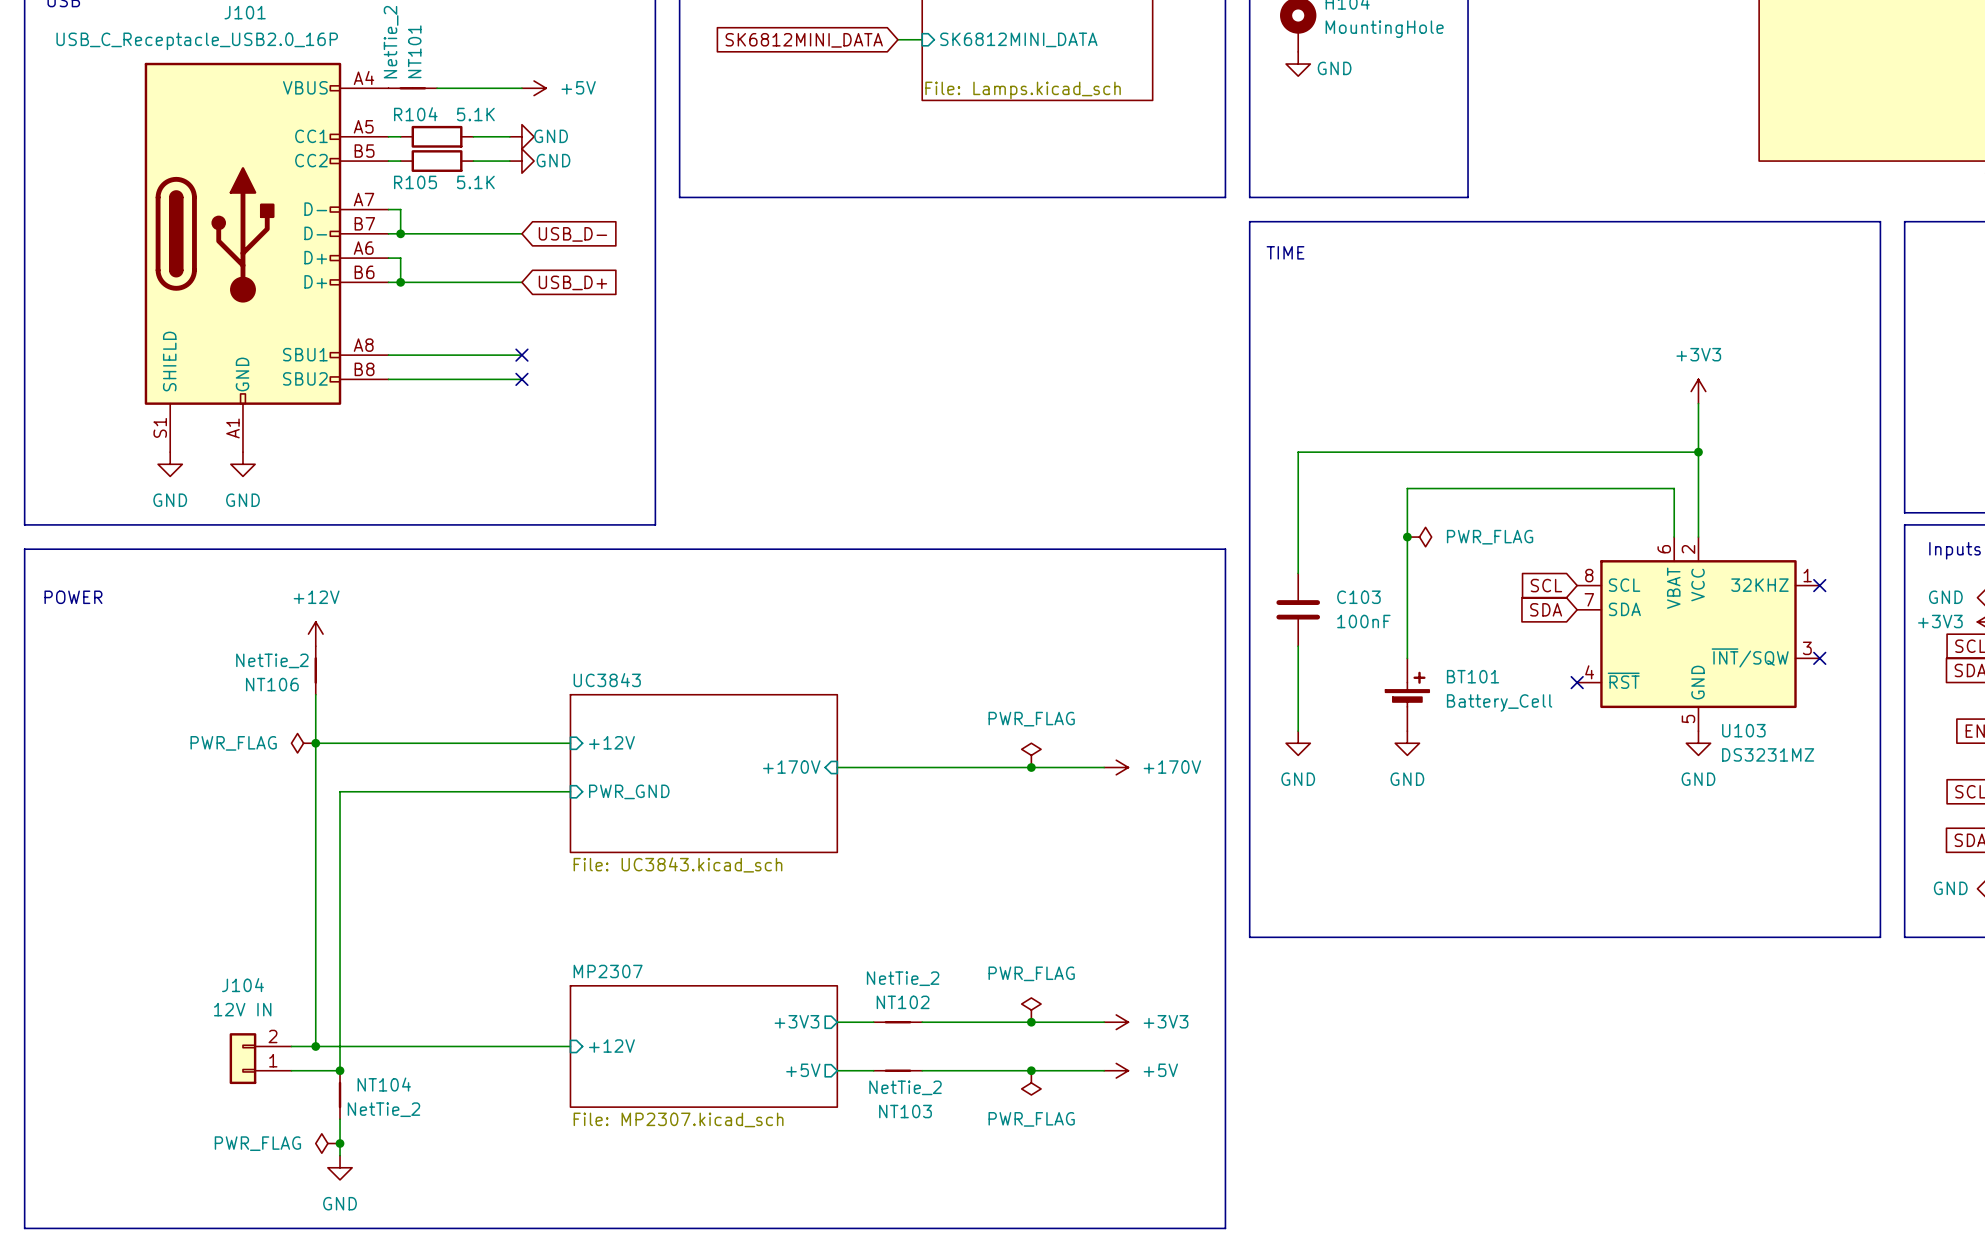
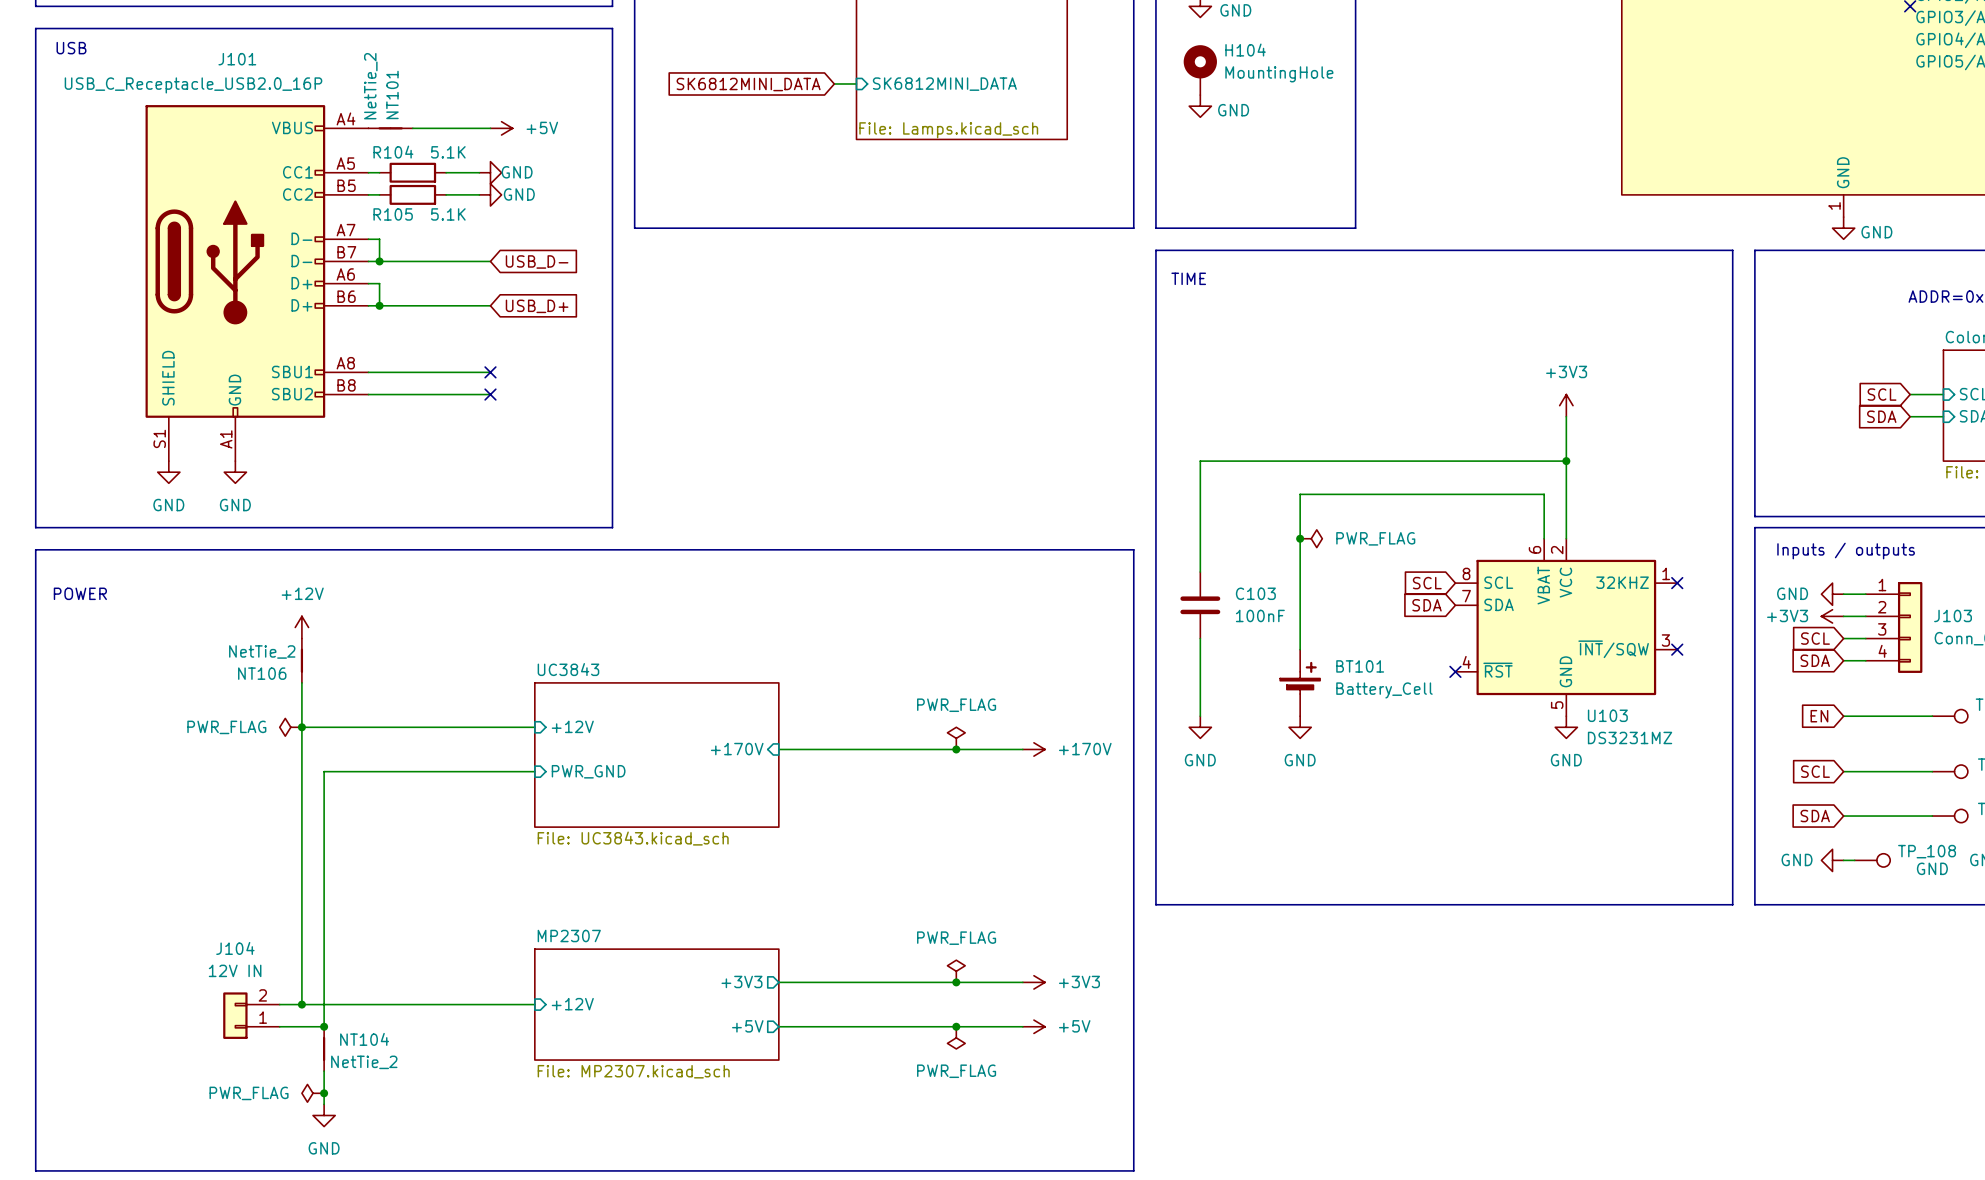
NT102: NetTie_2 (897, 1022) -> none
NT103: NetTie_2 (897, 1070) -> none

